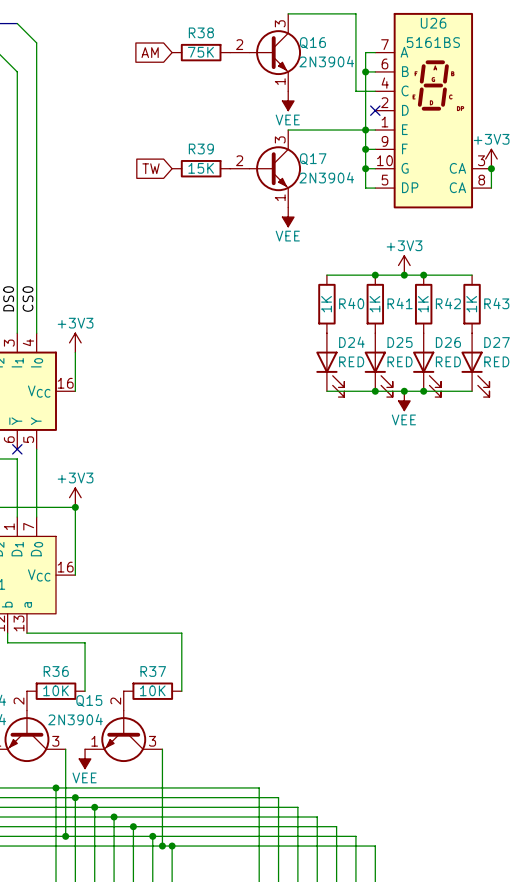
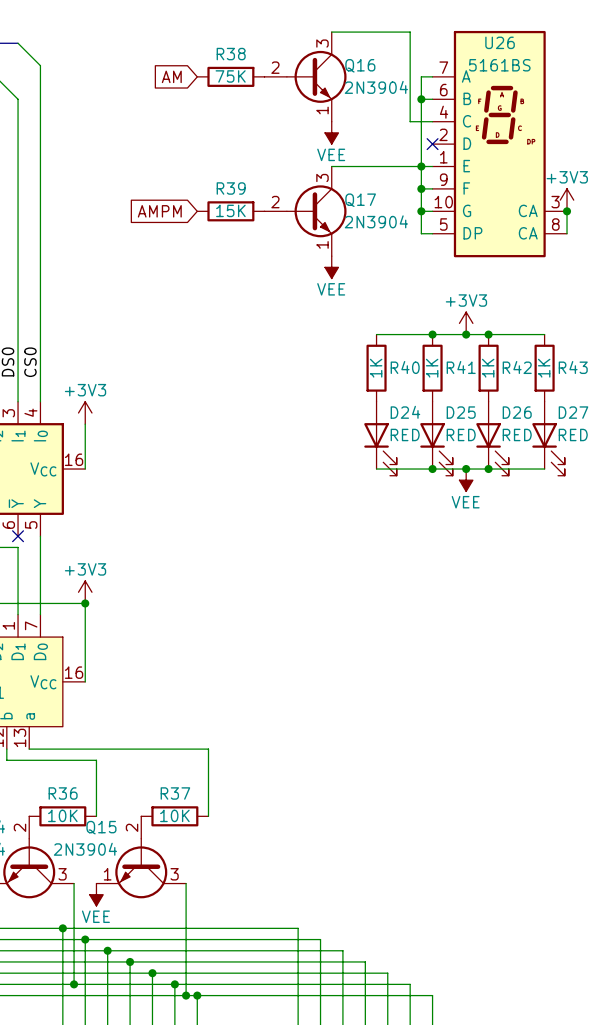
global label: TW (151, 168) -> AMPM (159, 211)

